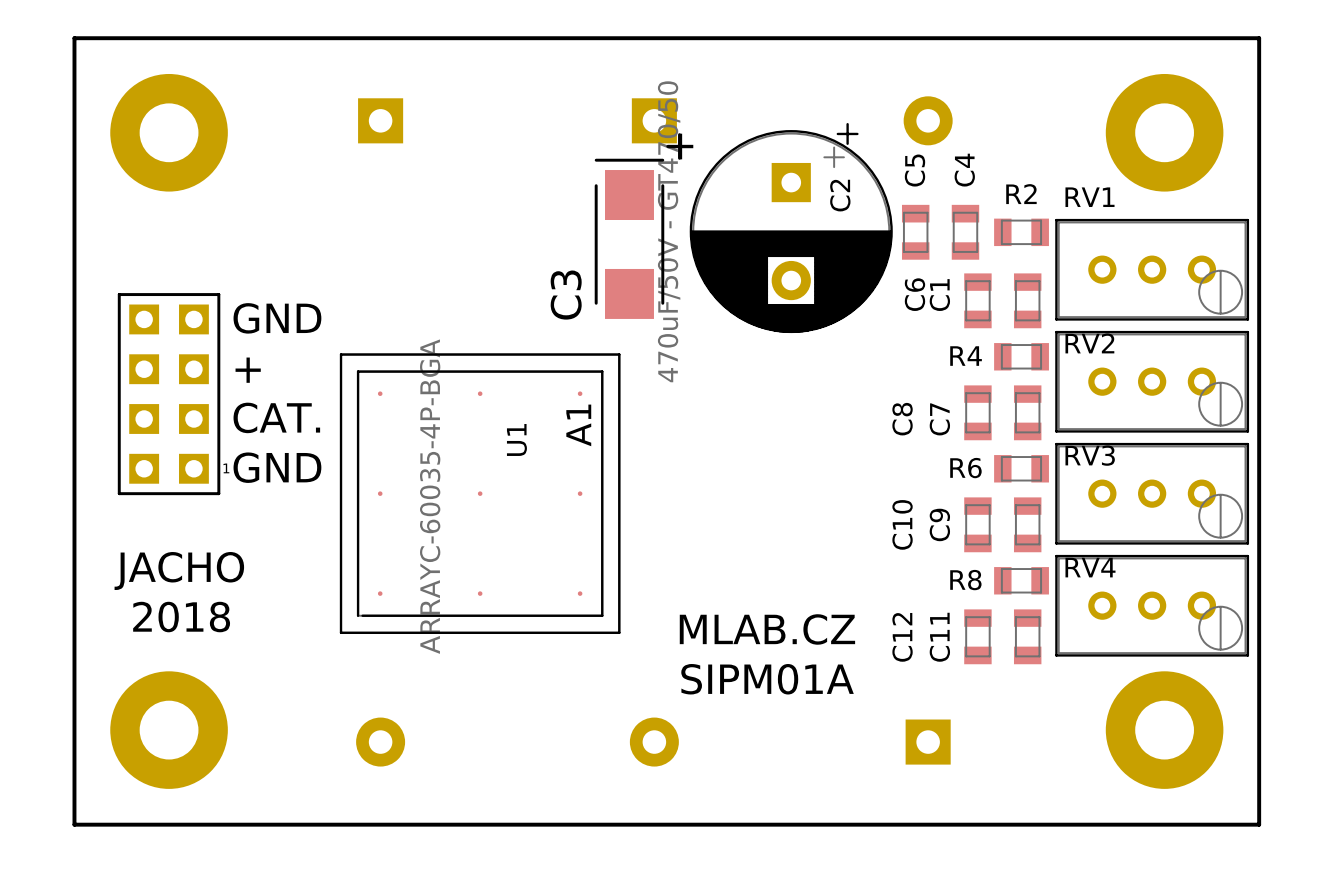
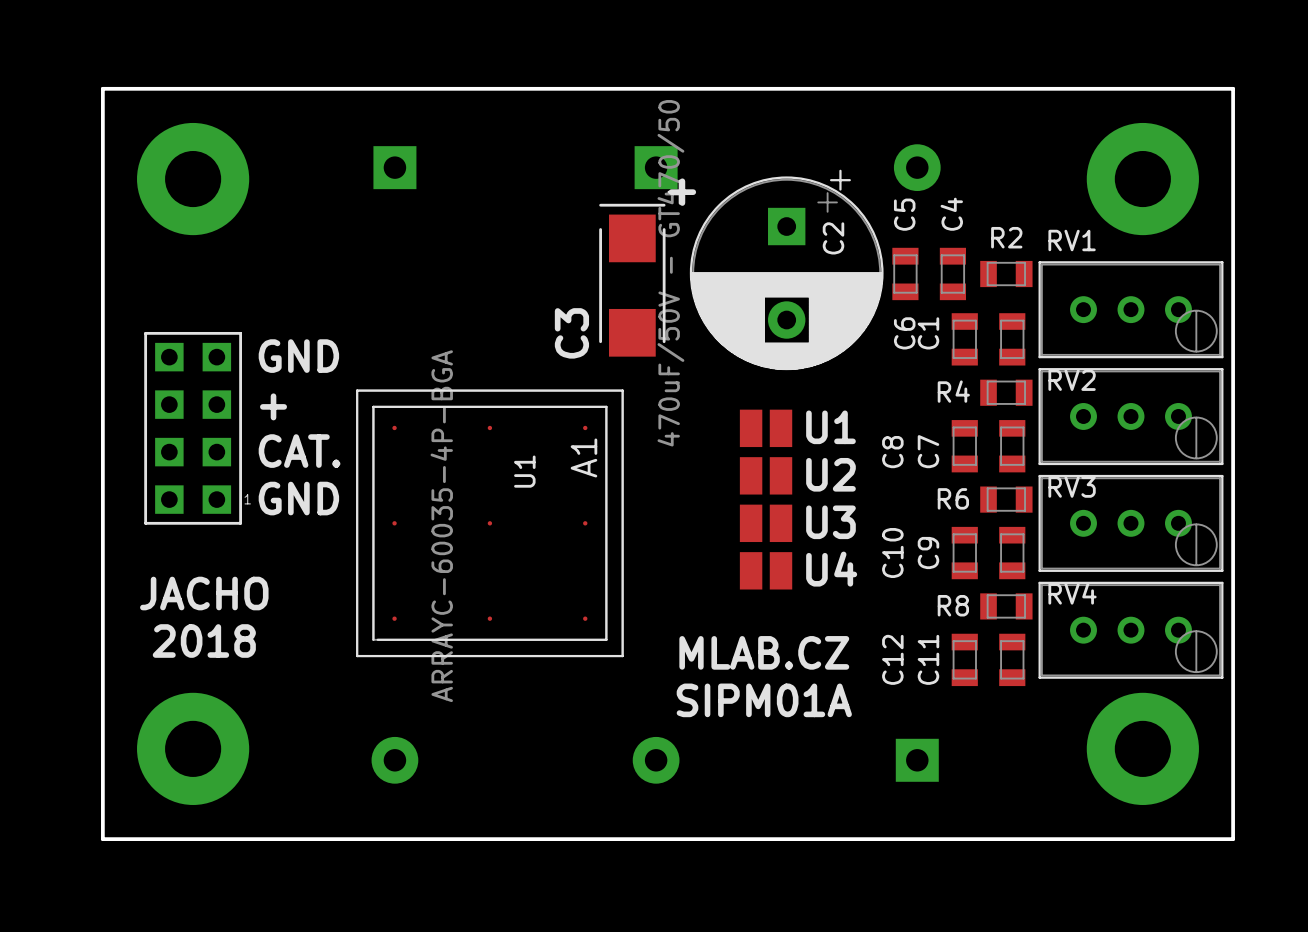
text: none -> U1 (830, 427)
part: none -> (766, 428)
text: none -> U2 (830, 474)
part: none -> (766, 475)
text: none -> U3 (830, 522)
part: none -> (766, 523)
text: none -> U4 (831, 569)
part: none -> (766, 570)

